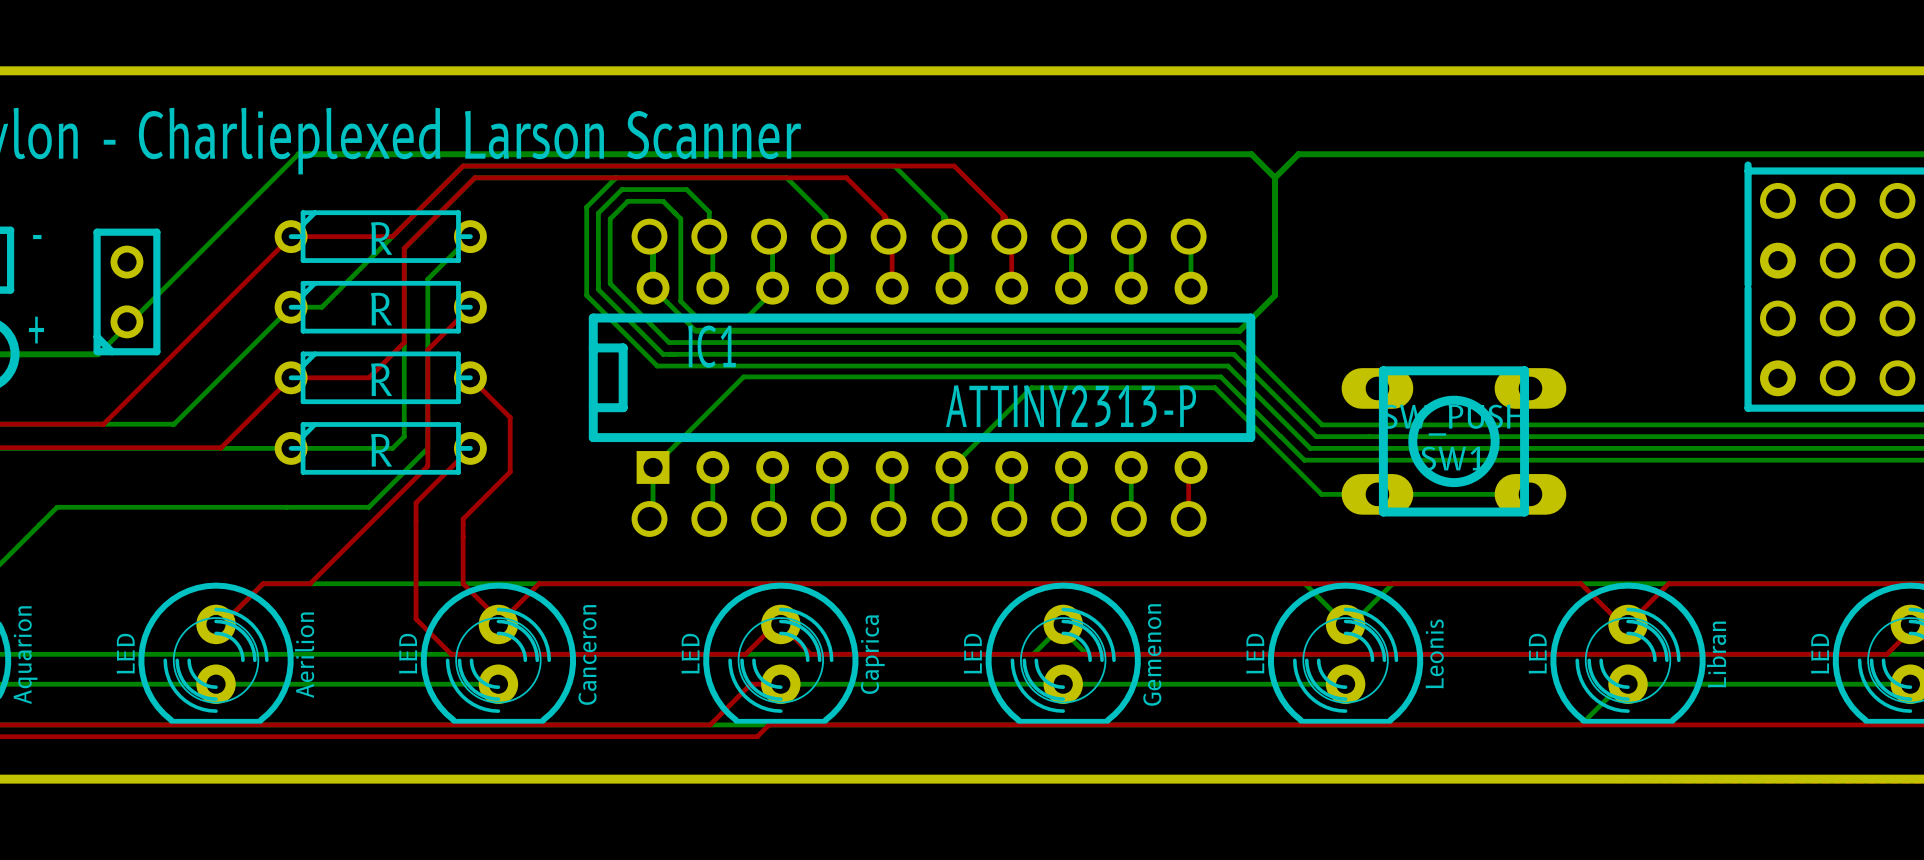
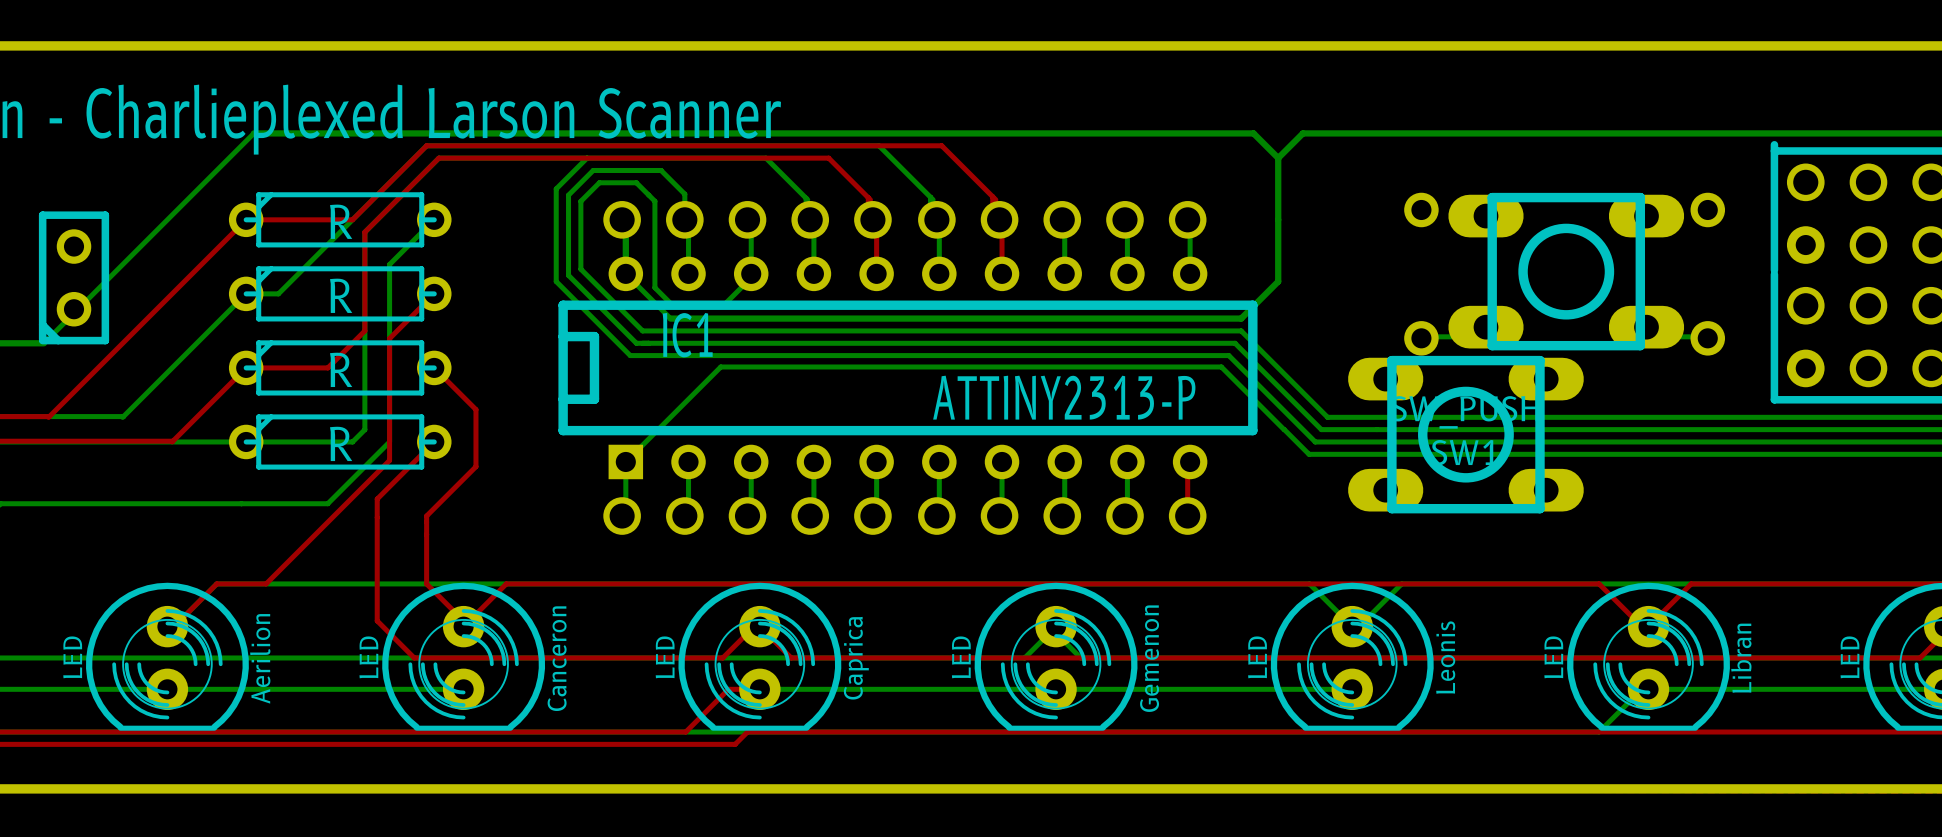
part: none -> (1421, 209)
part: none -> (1707, 209)
part: none -> (1566, 271)
bottom track: none -> (1470, 336) (1421, 338)
bottom track: none -> (1658, 336) (1707, 338)
part: none -> (1421, 338)
part: none -> (1707, 338)
bottom track: (951, 467) (1031, 387) (1215, 387) (1321, 494) (1530, 494) -> none

